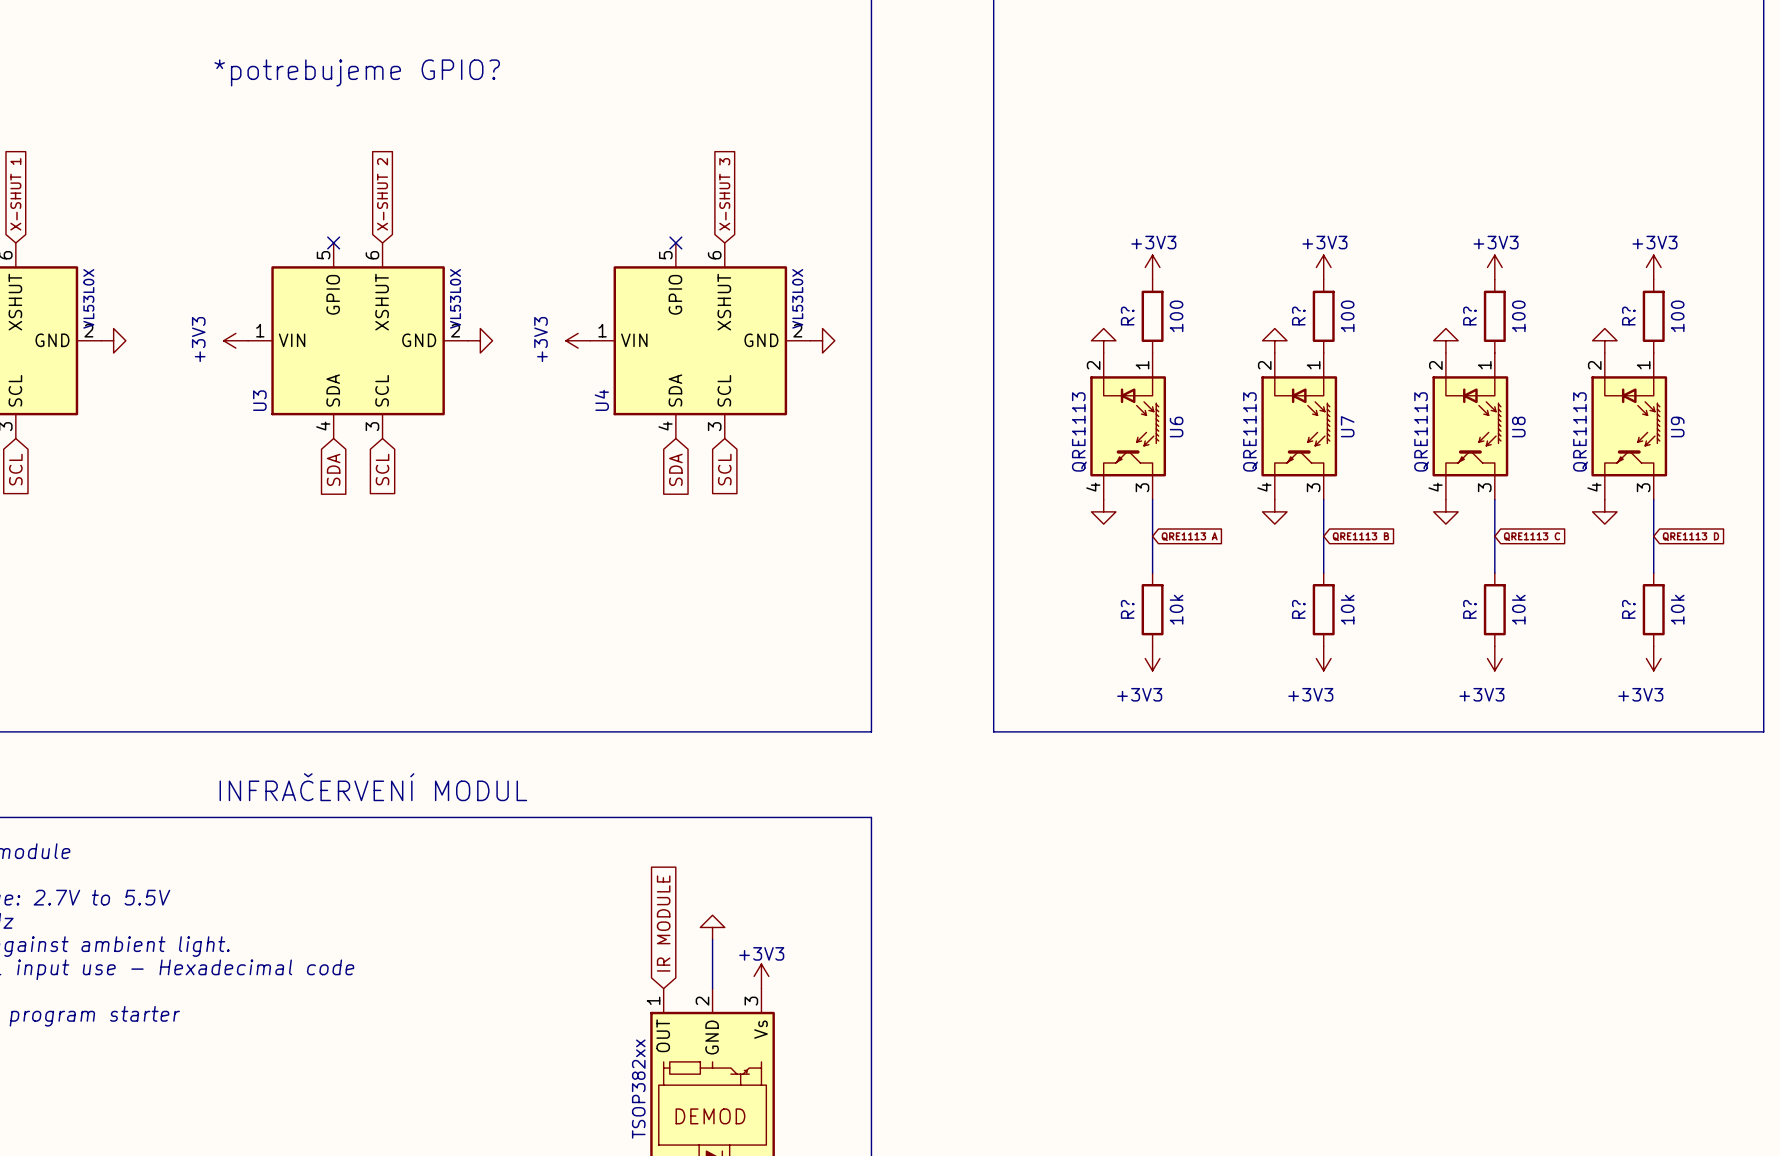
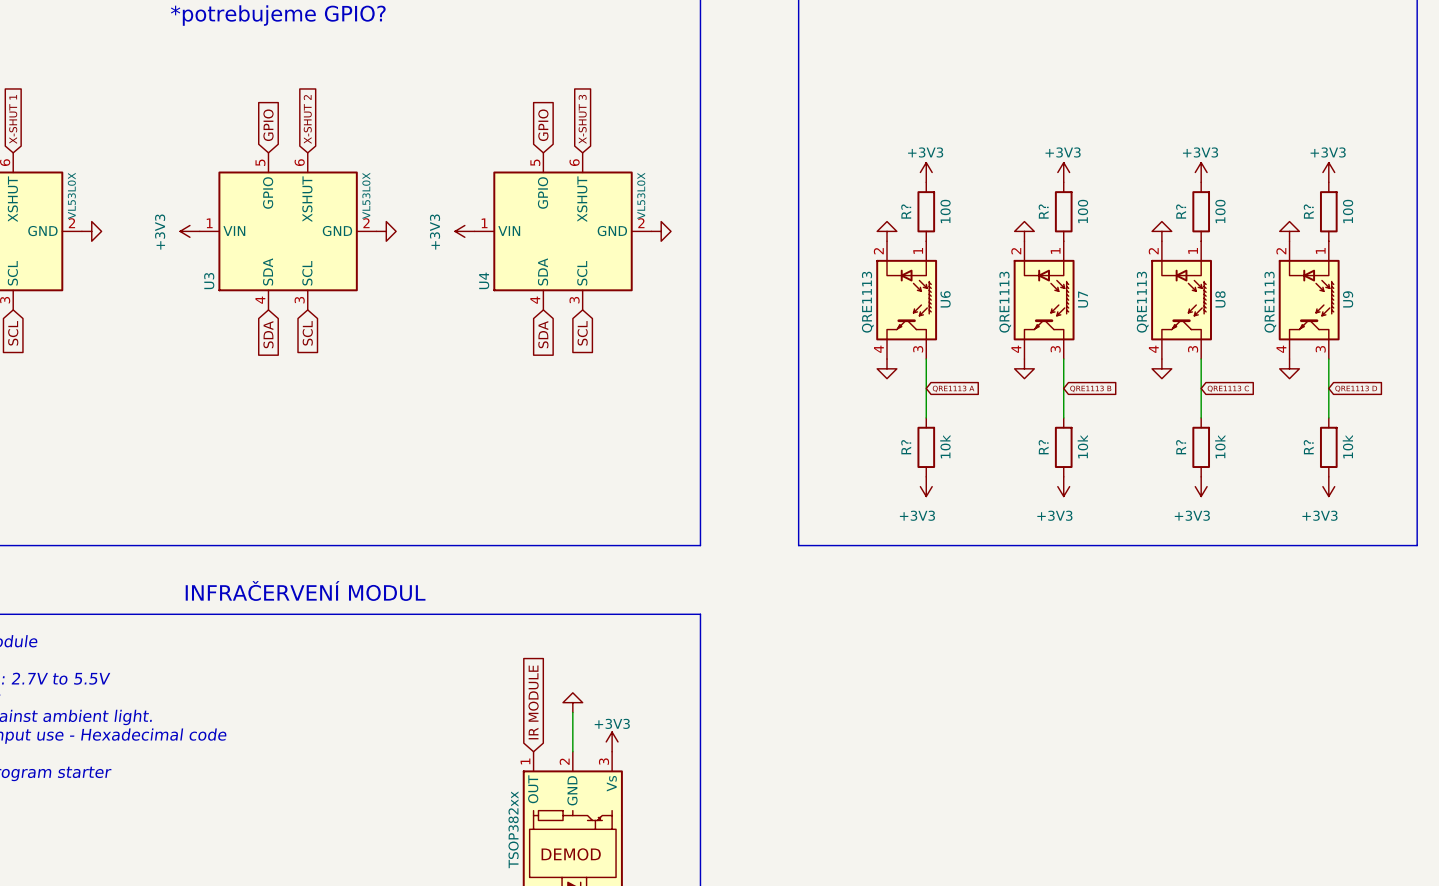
global label: none -> GPIO (268, 125)
global label: none -> GPIO (543, 125)
no-connect mark: (333, 242) -> none
no-connect mark: (675, 242) -> none

